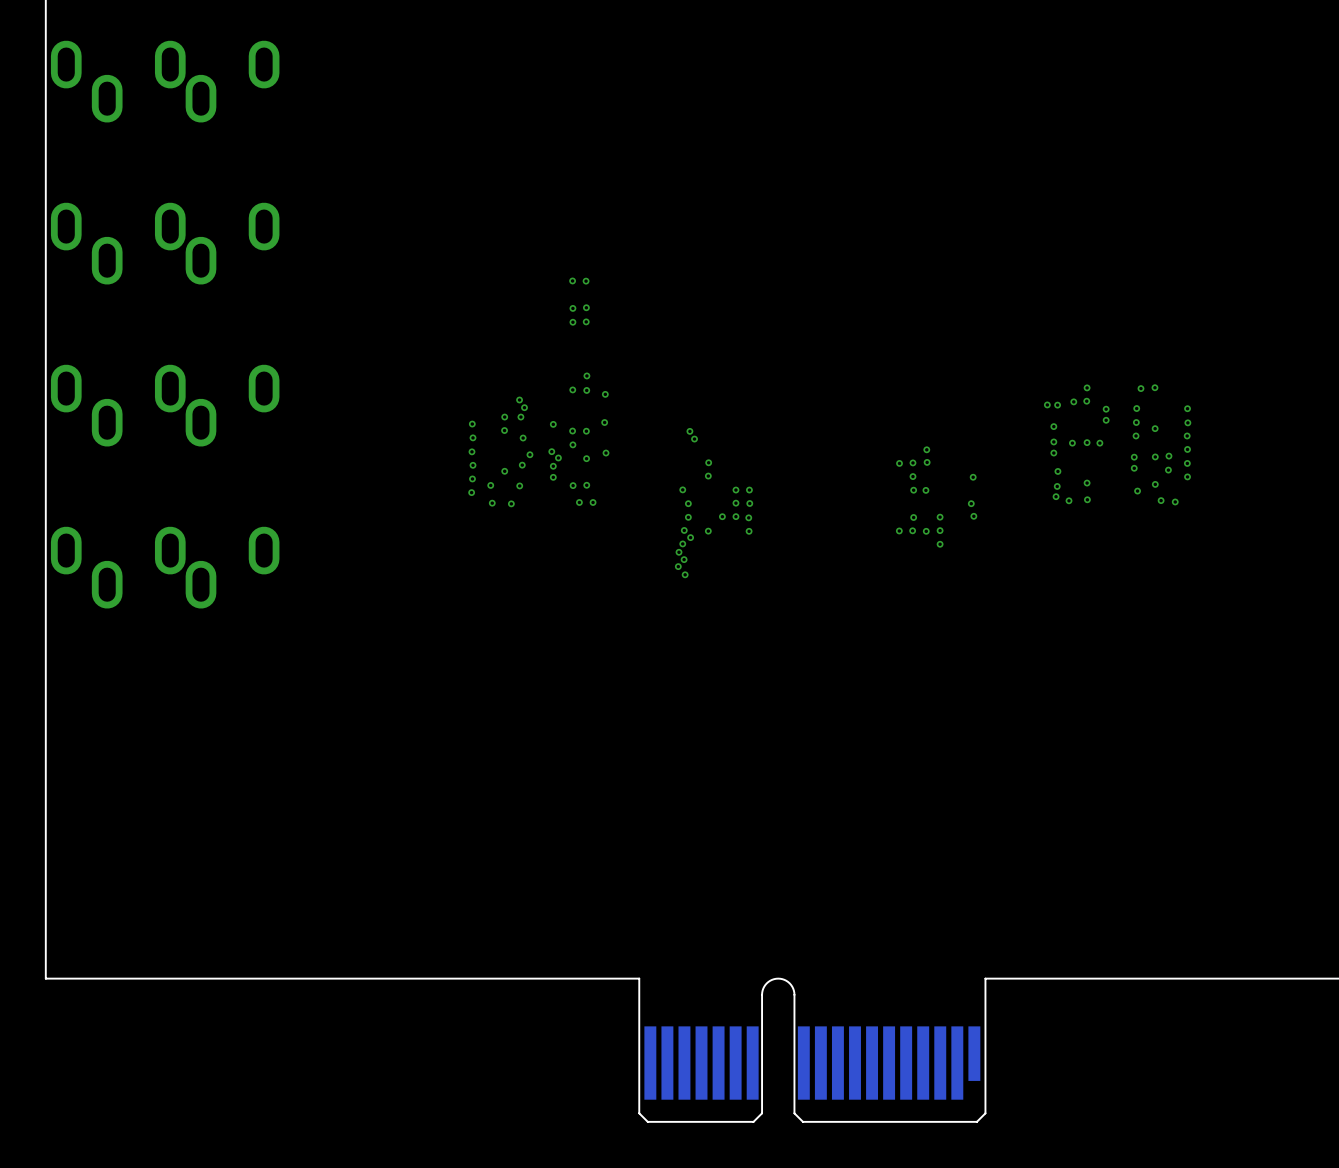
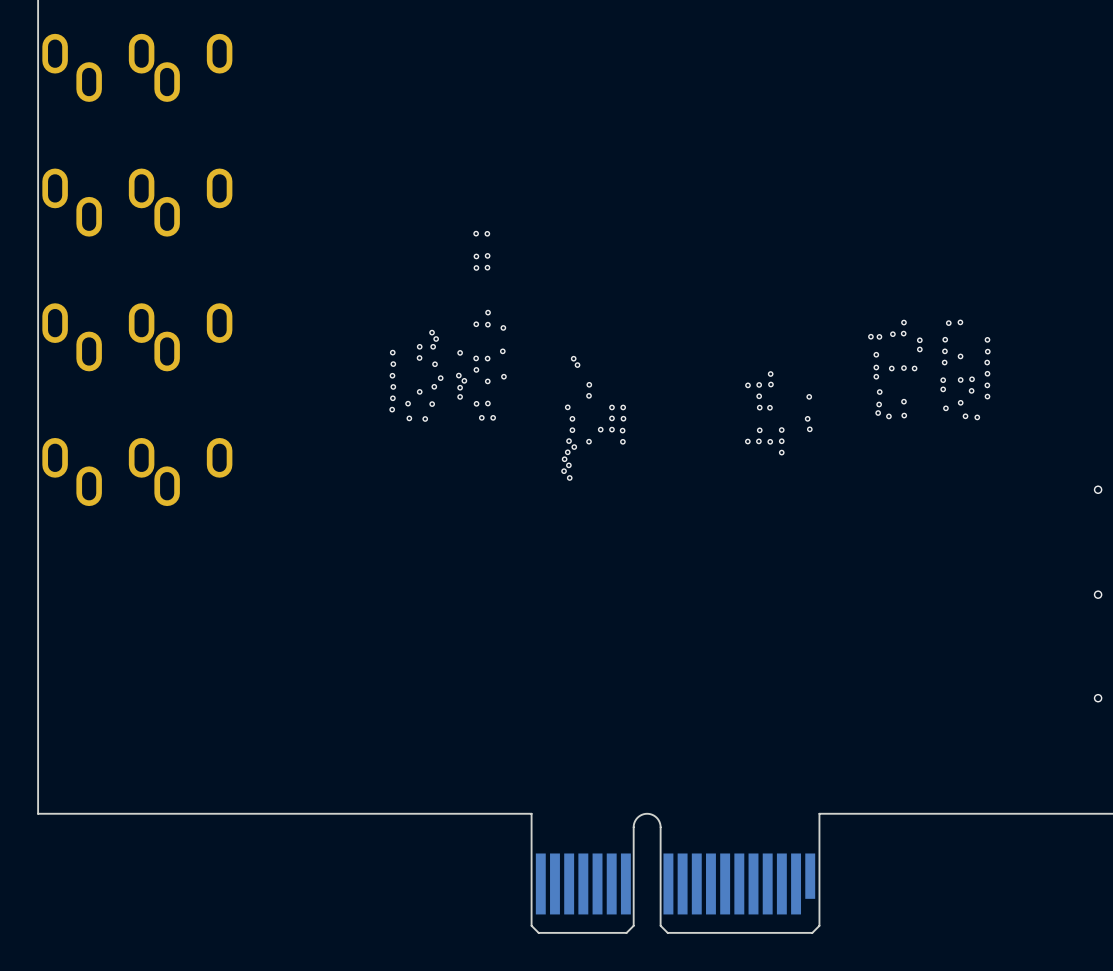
via: none -> (1098, 489)
via: none -> (1098, 594)
via: none -> (1098, 698)

